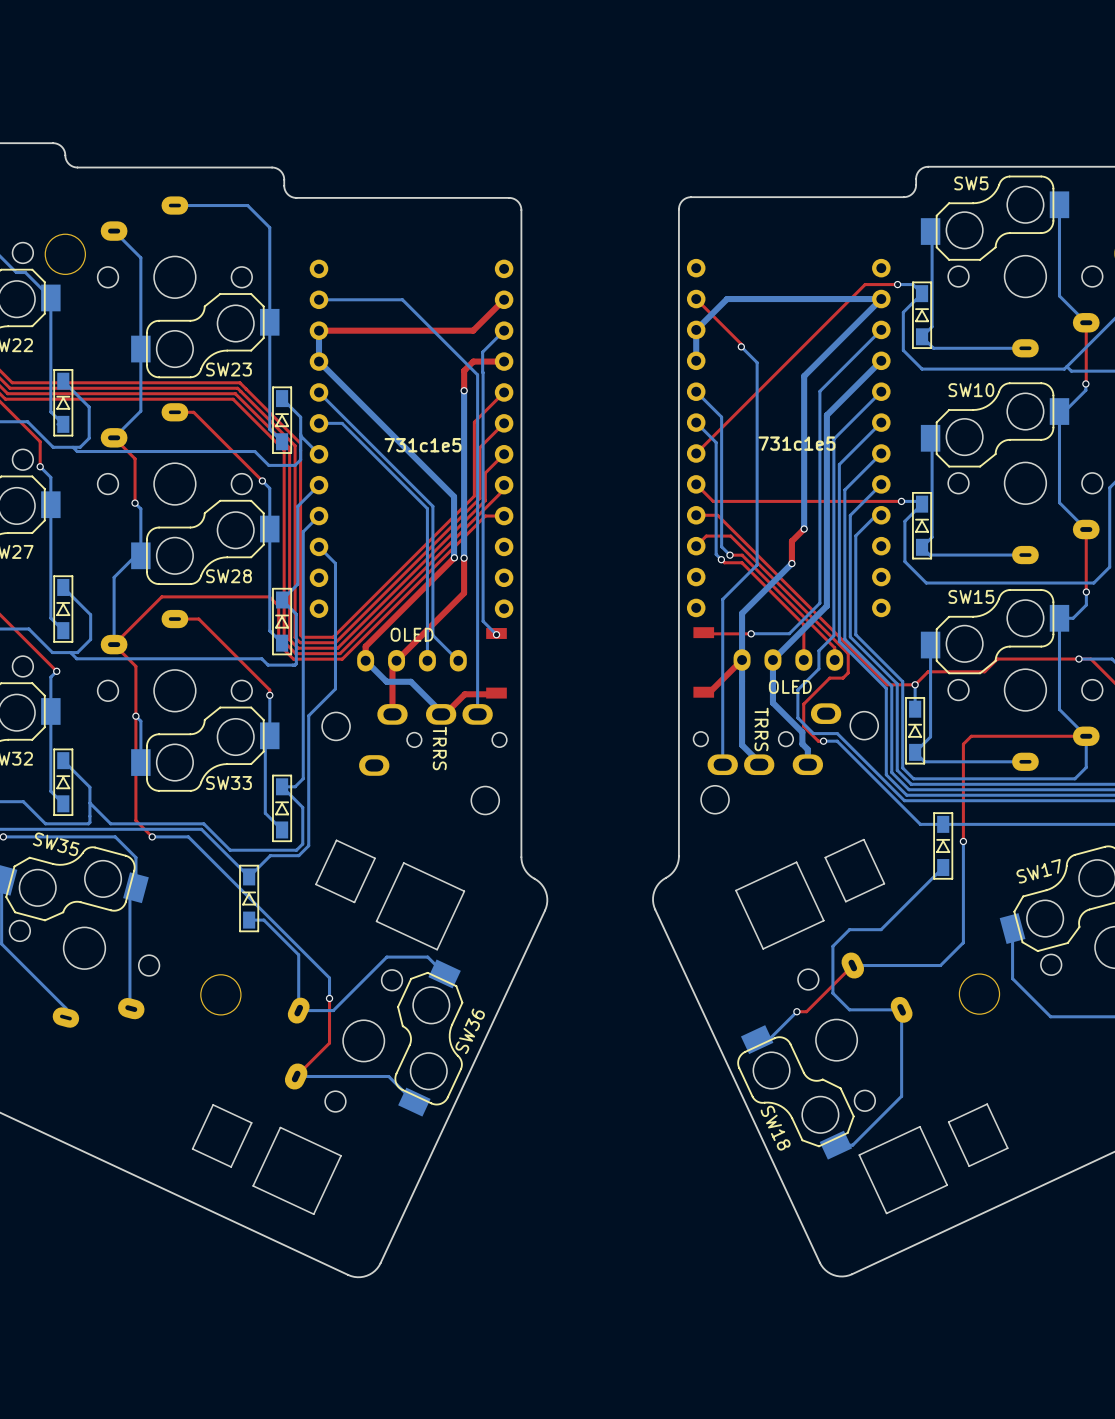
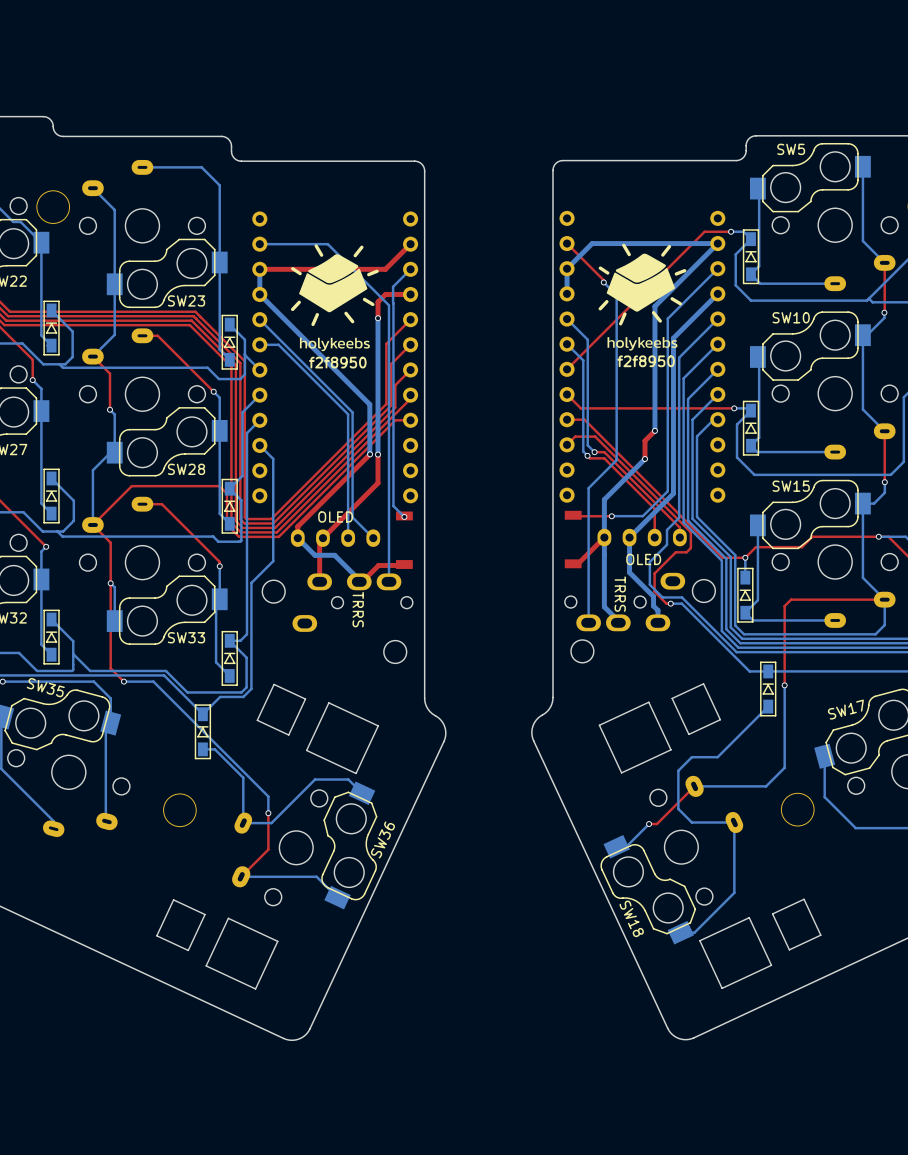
drawing: none -> [291, 244, 379, 352]
drawing: none -> [598, 243, 687, 351]
text: 731c1e5 (797, 443) -> f2f8950 (646, 361)
text: 731c1e5 (423, 445) -> f2f8950 (337, 362)

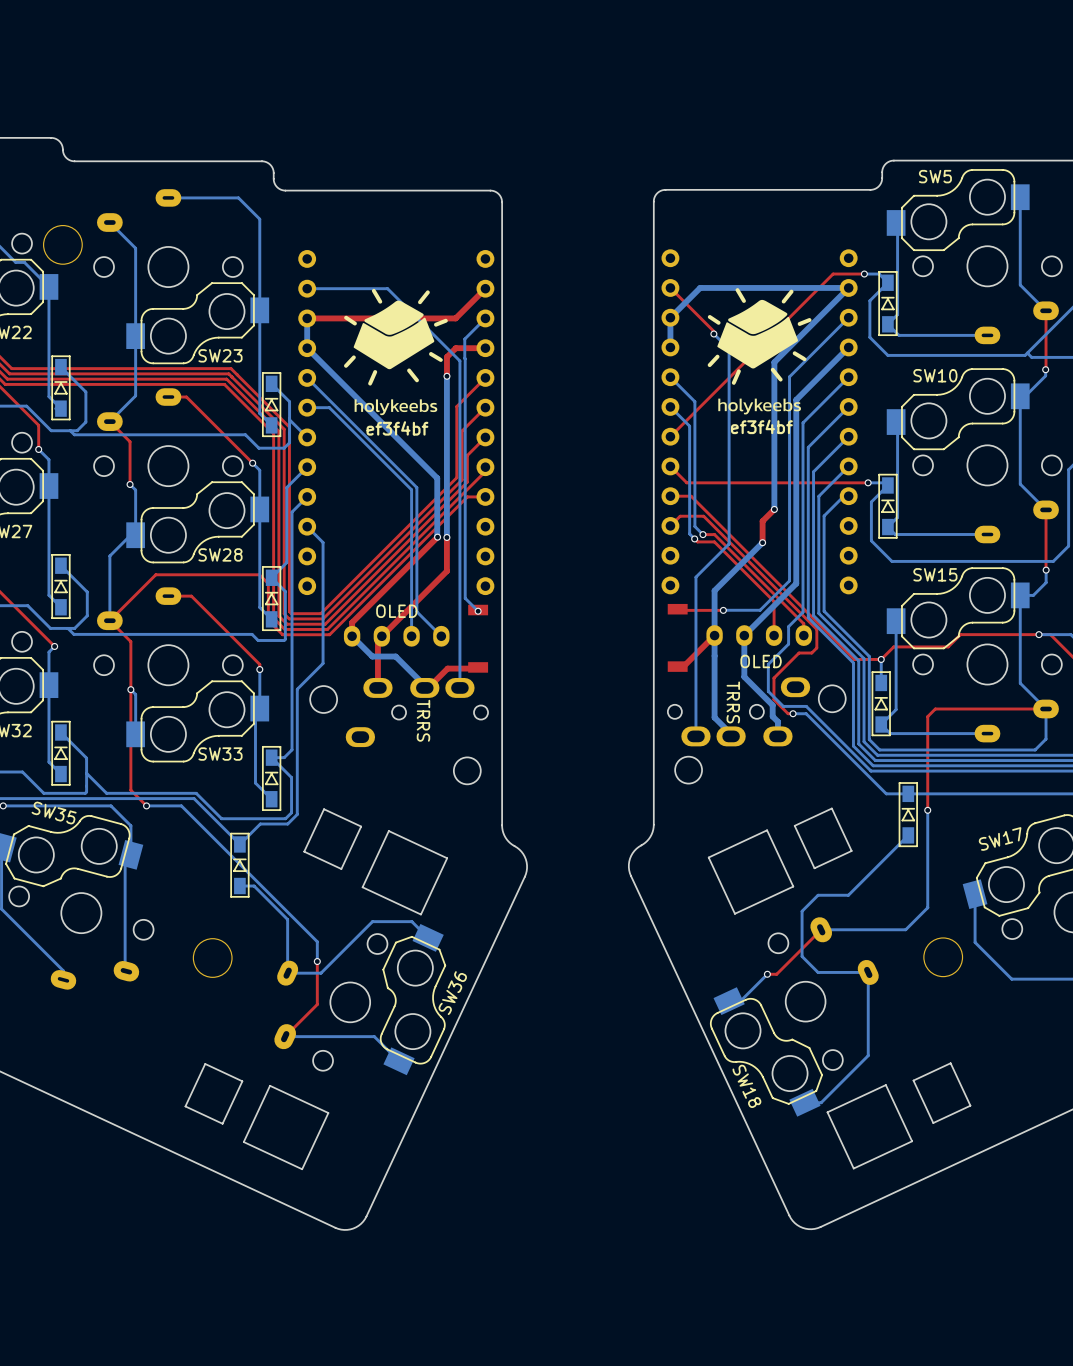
text: f2f8950 (646, 361) -> ef3f4bf (761, 426)
text: f2f8950 (337, 362) -> ef3f4bf (397, 428)

